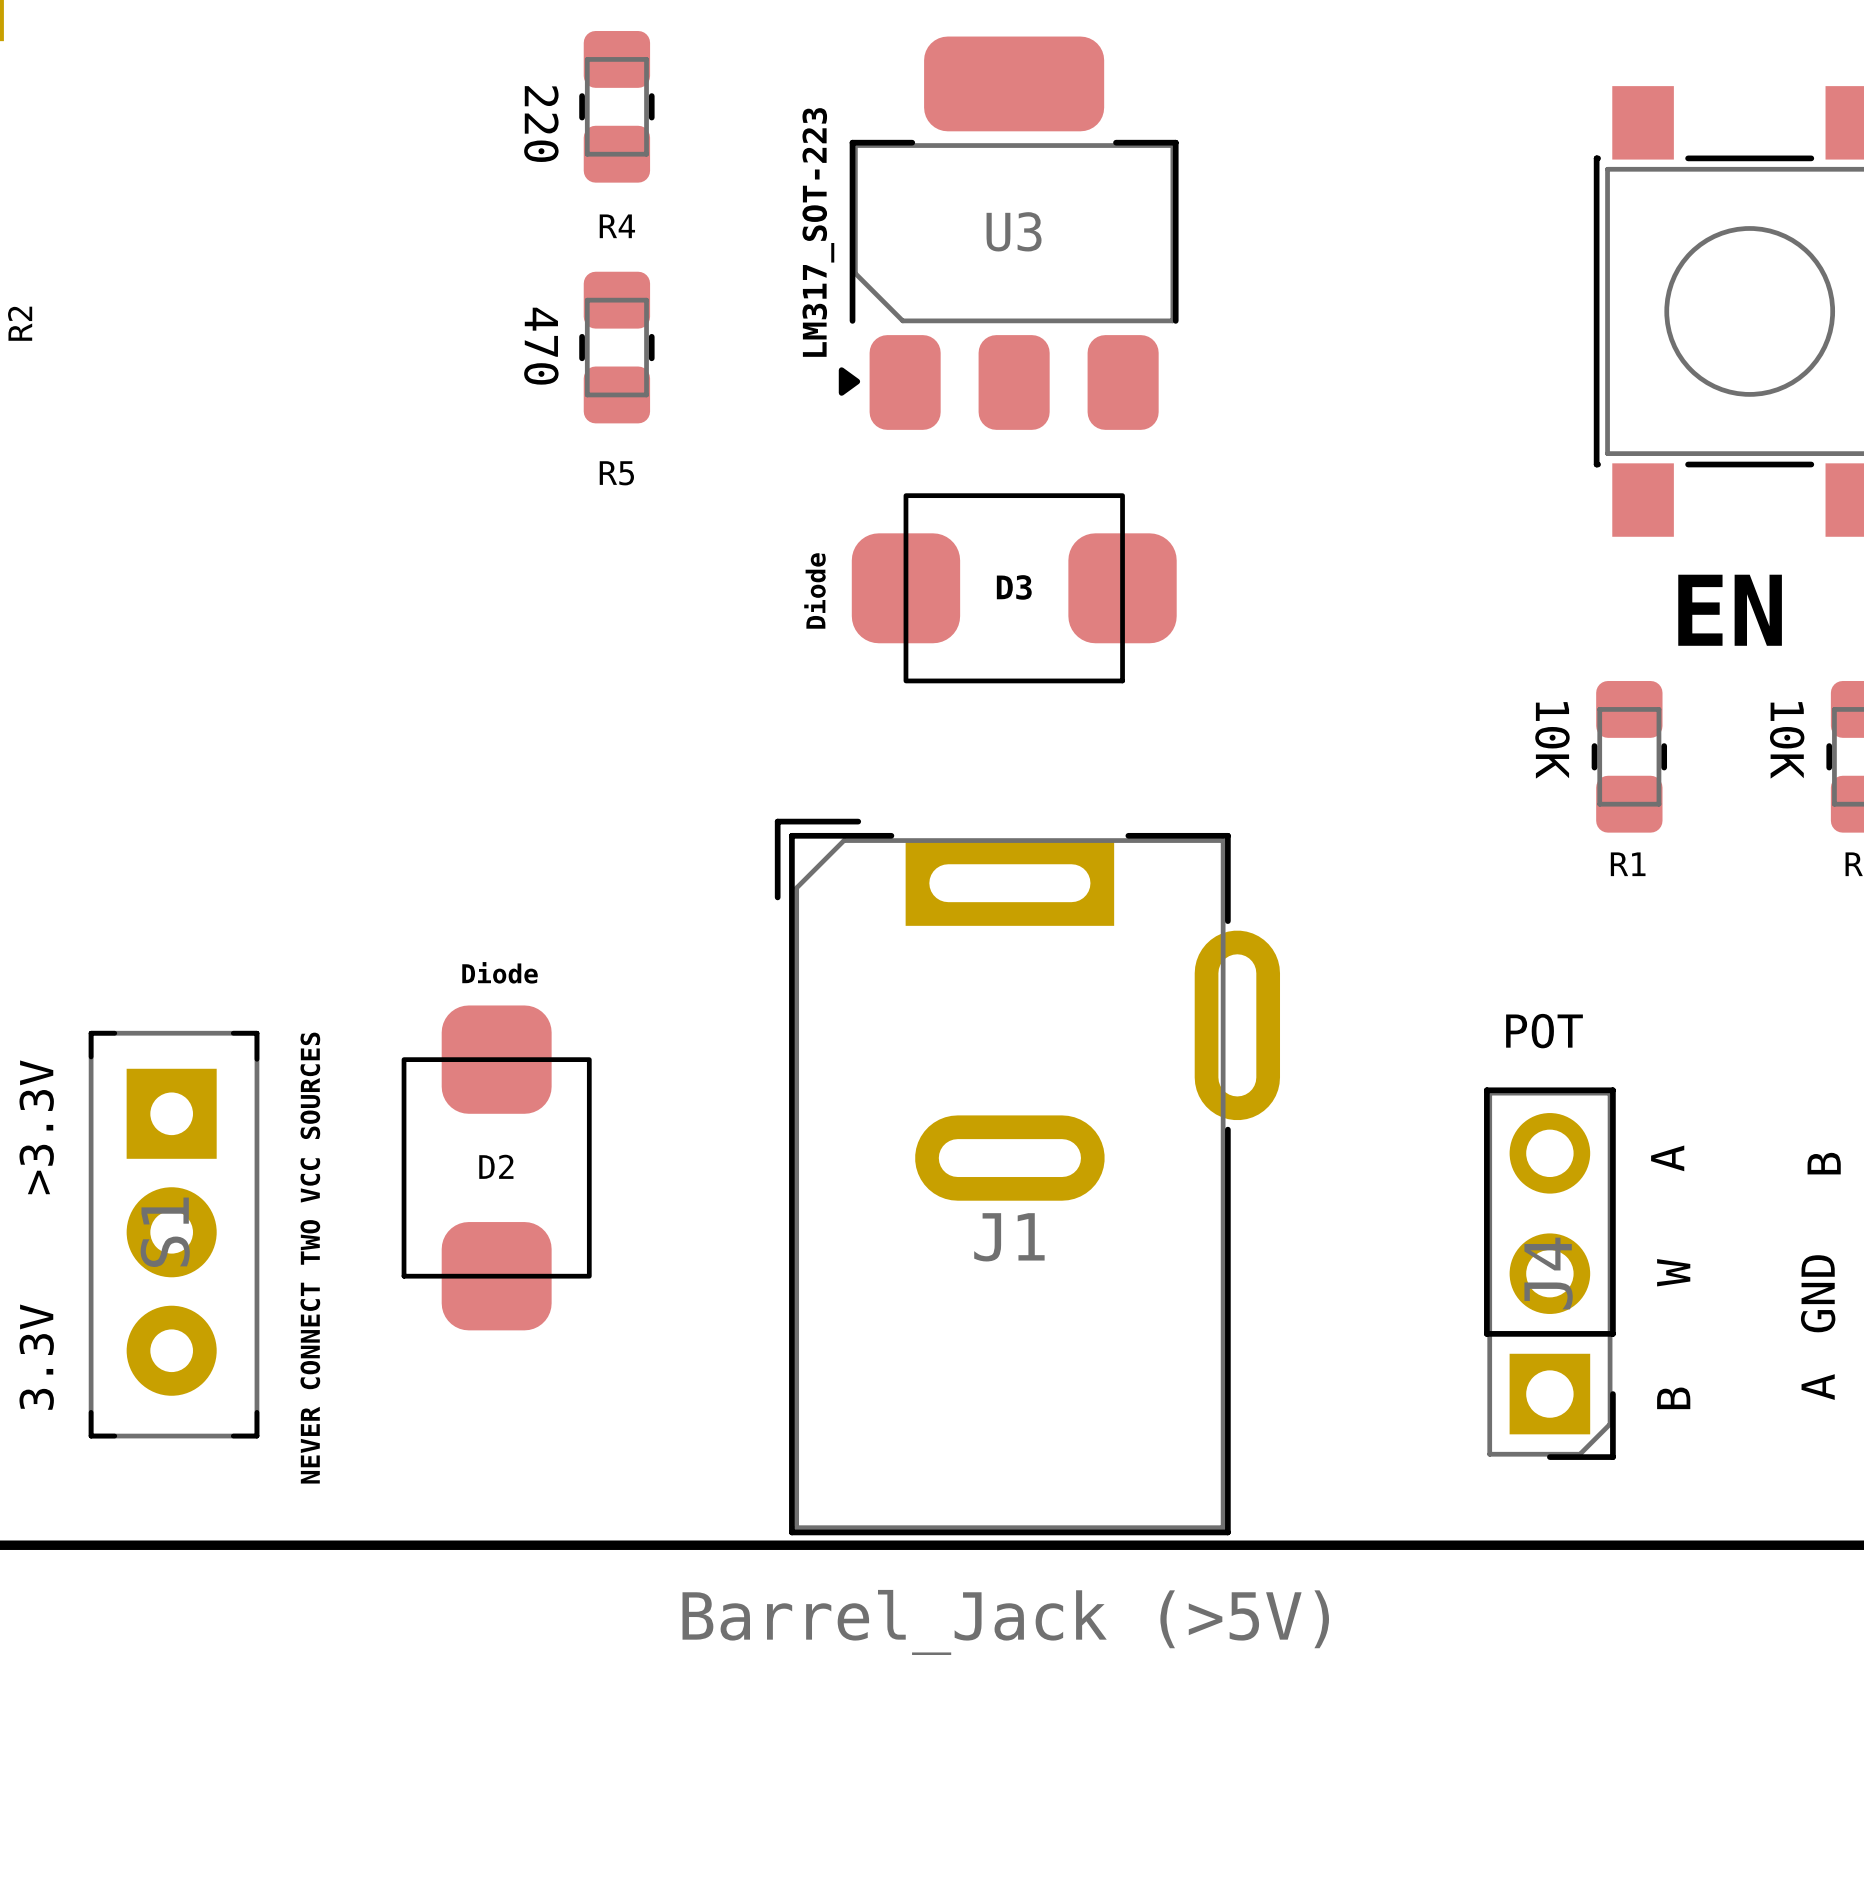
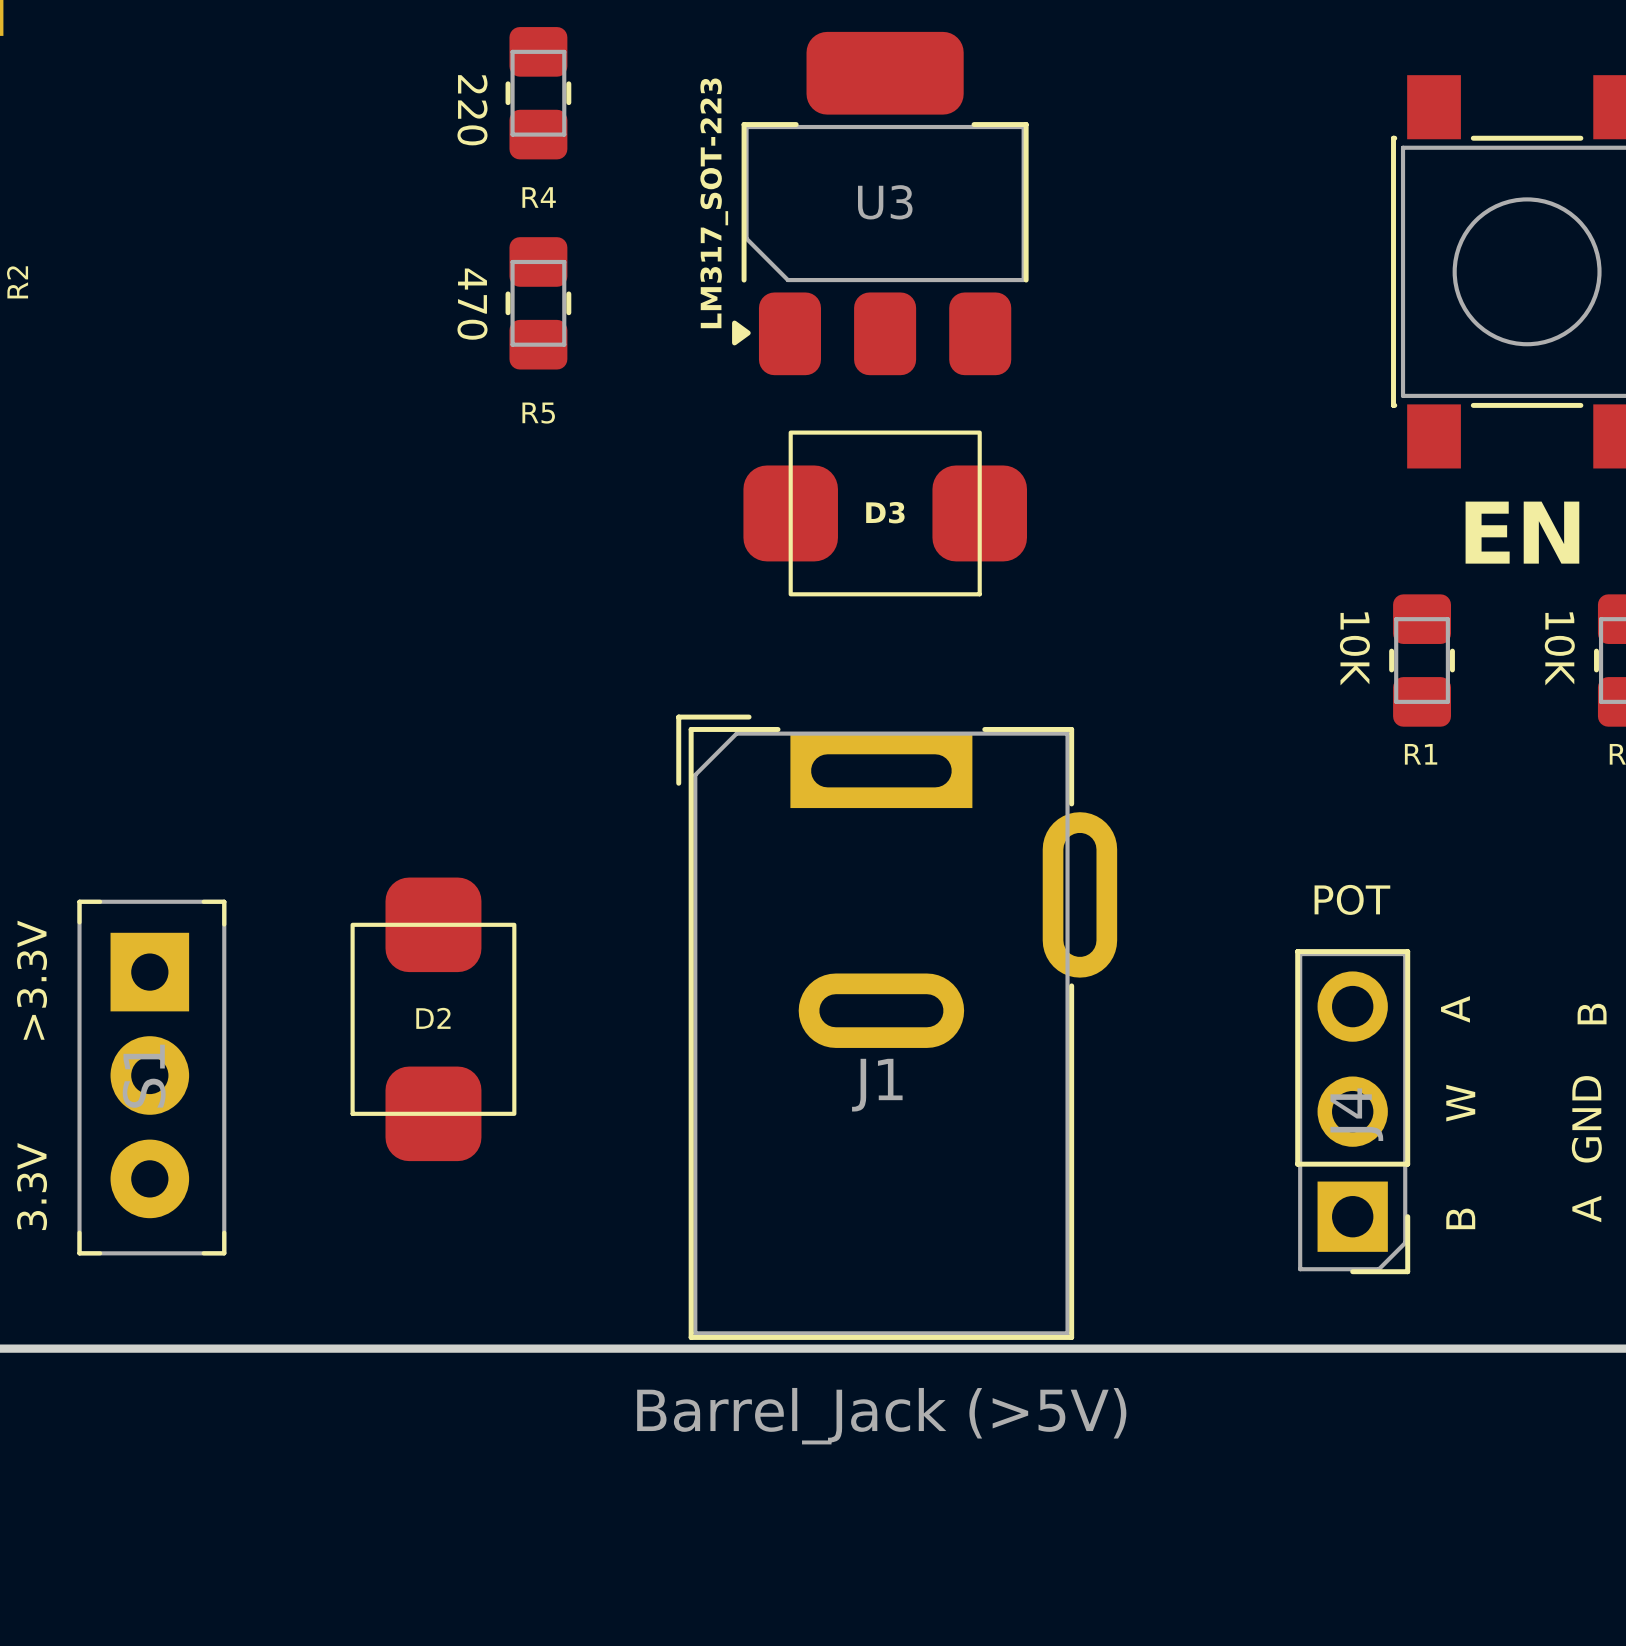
text: Diode (814, 590) -> none
text: Diode (500, 972) -> none
text: NEVER CONNECT TWO VCC SOURCES (310, 1258) -> none

